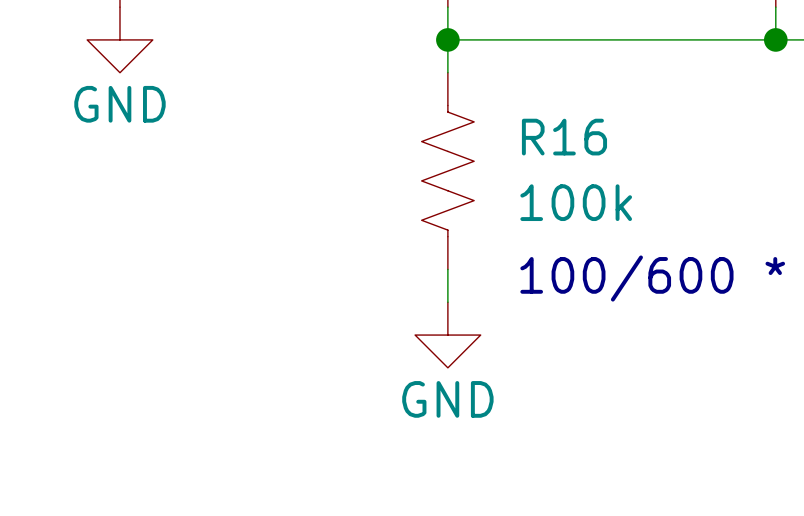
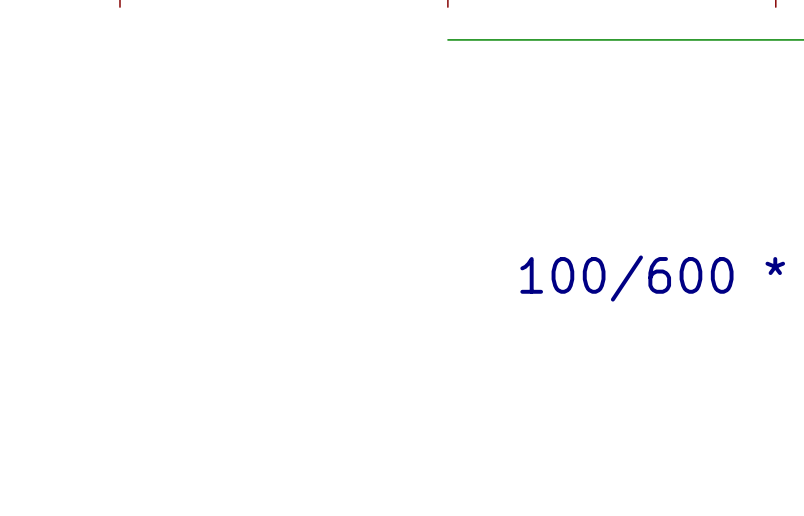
wire: (447, 7) (447, 72) -> none
wire: (775, 7) (775, 39) -> none
power symbol: GND (119, 39) -> none
junction: (447, 39) -> none
junction: (775, 39) -> none
R16: 100k (447, 171) -> none
wire: (447, 269) (447, 302) -> none
power symbol: GND (447, 335) -> none

